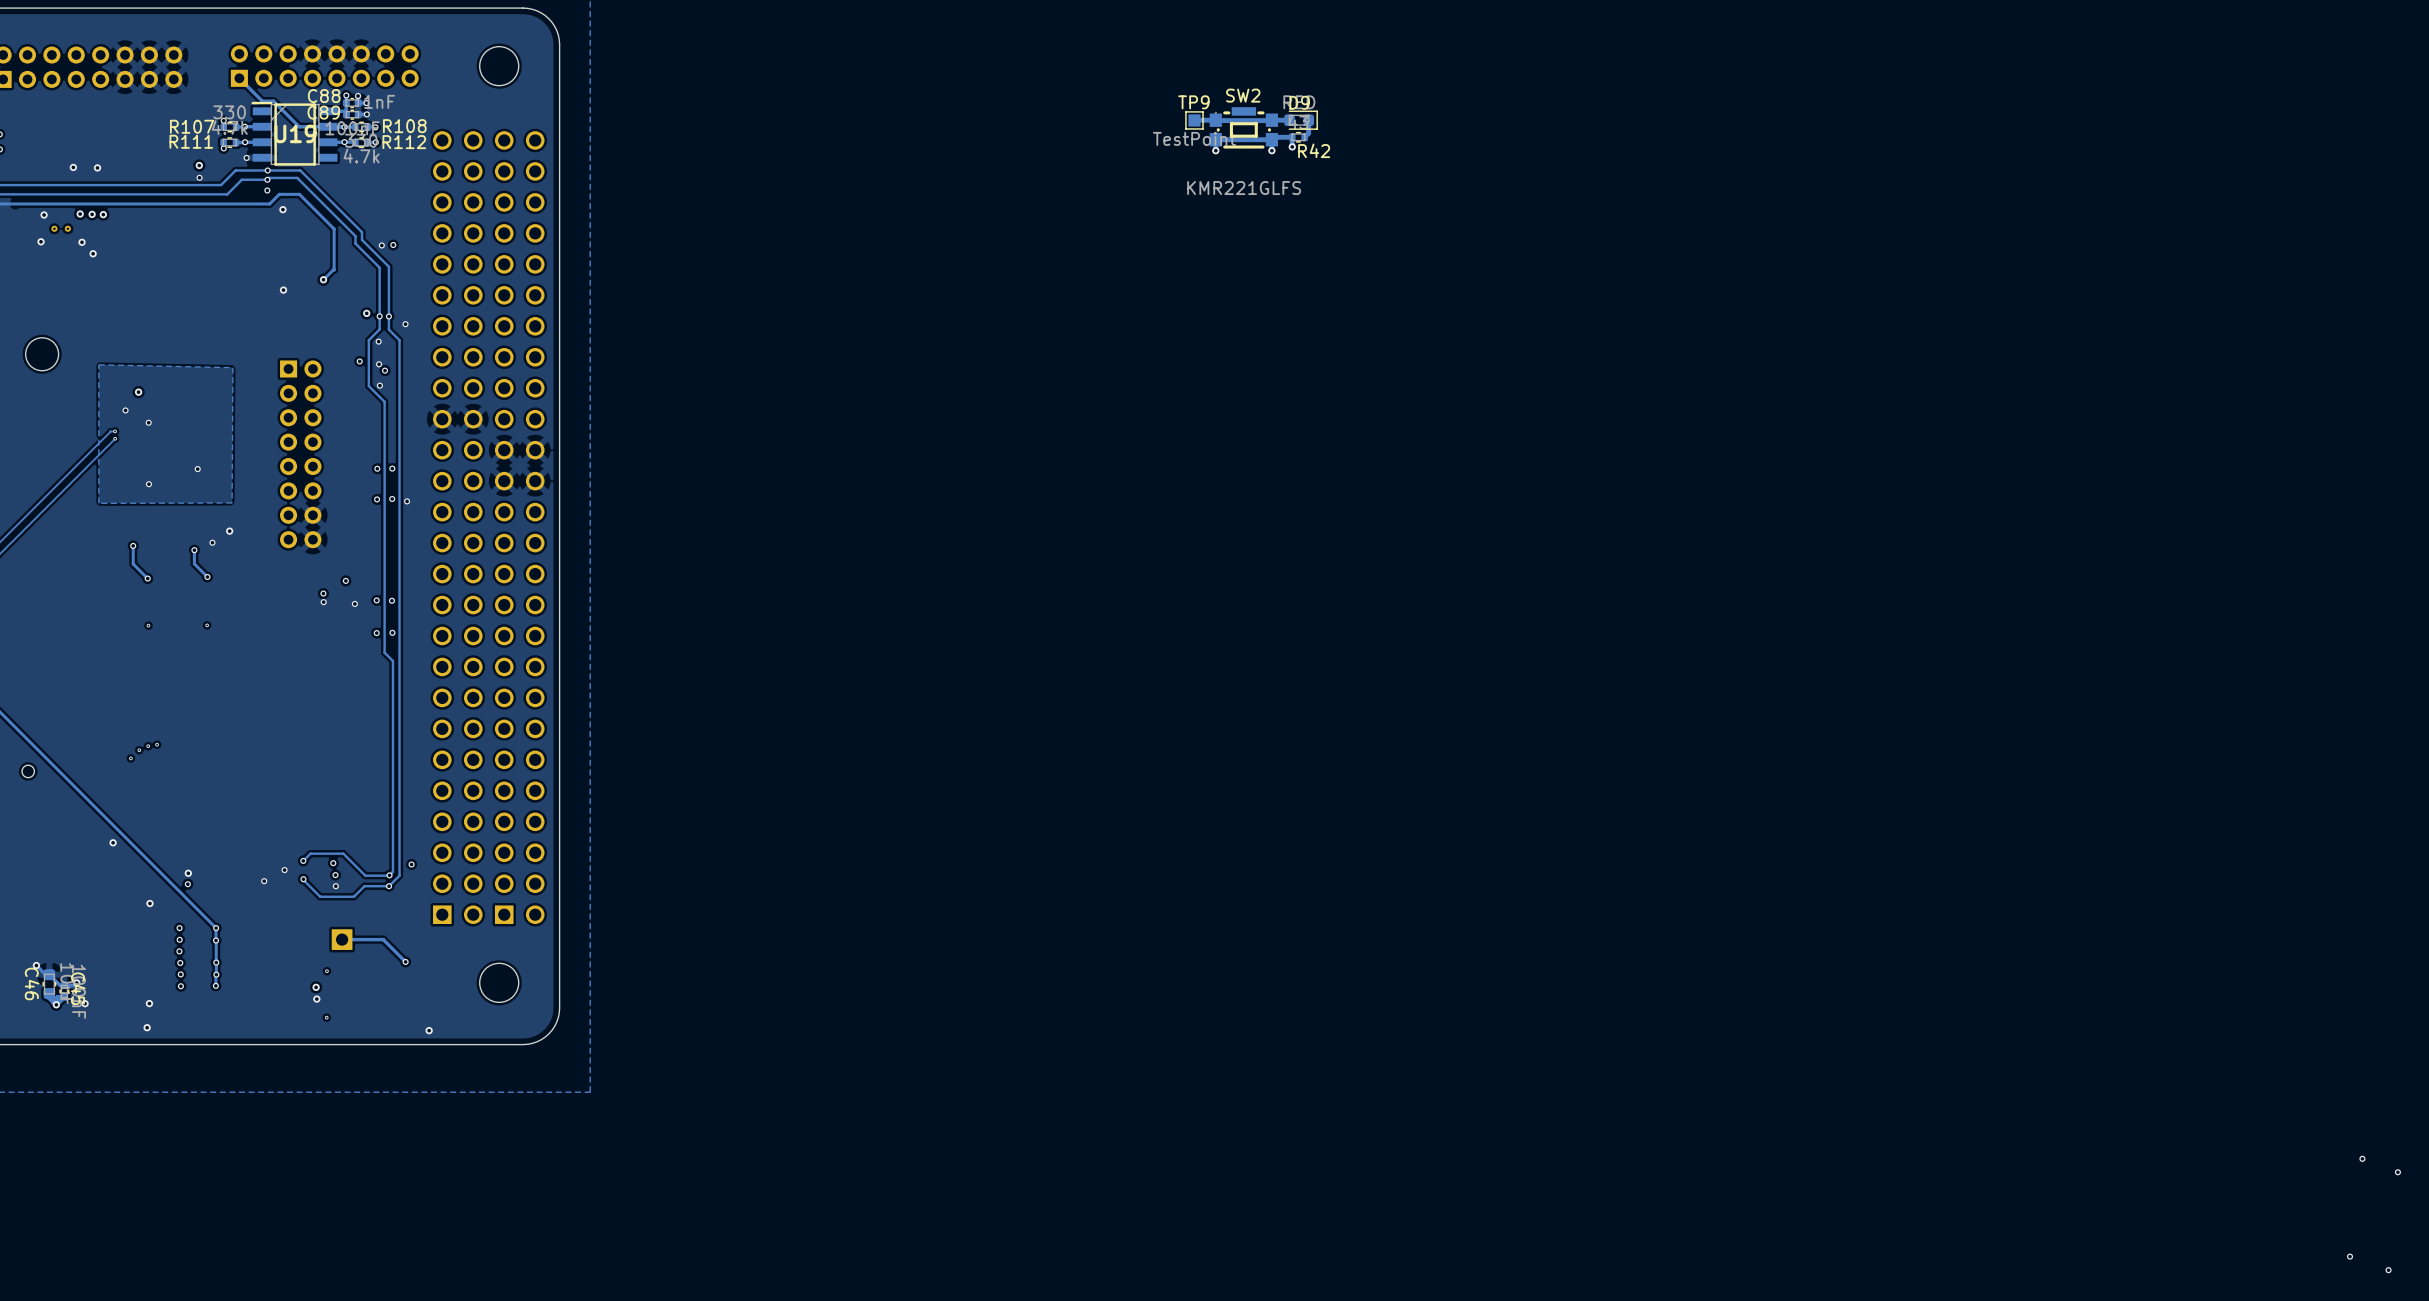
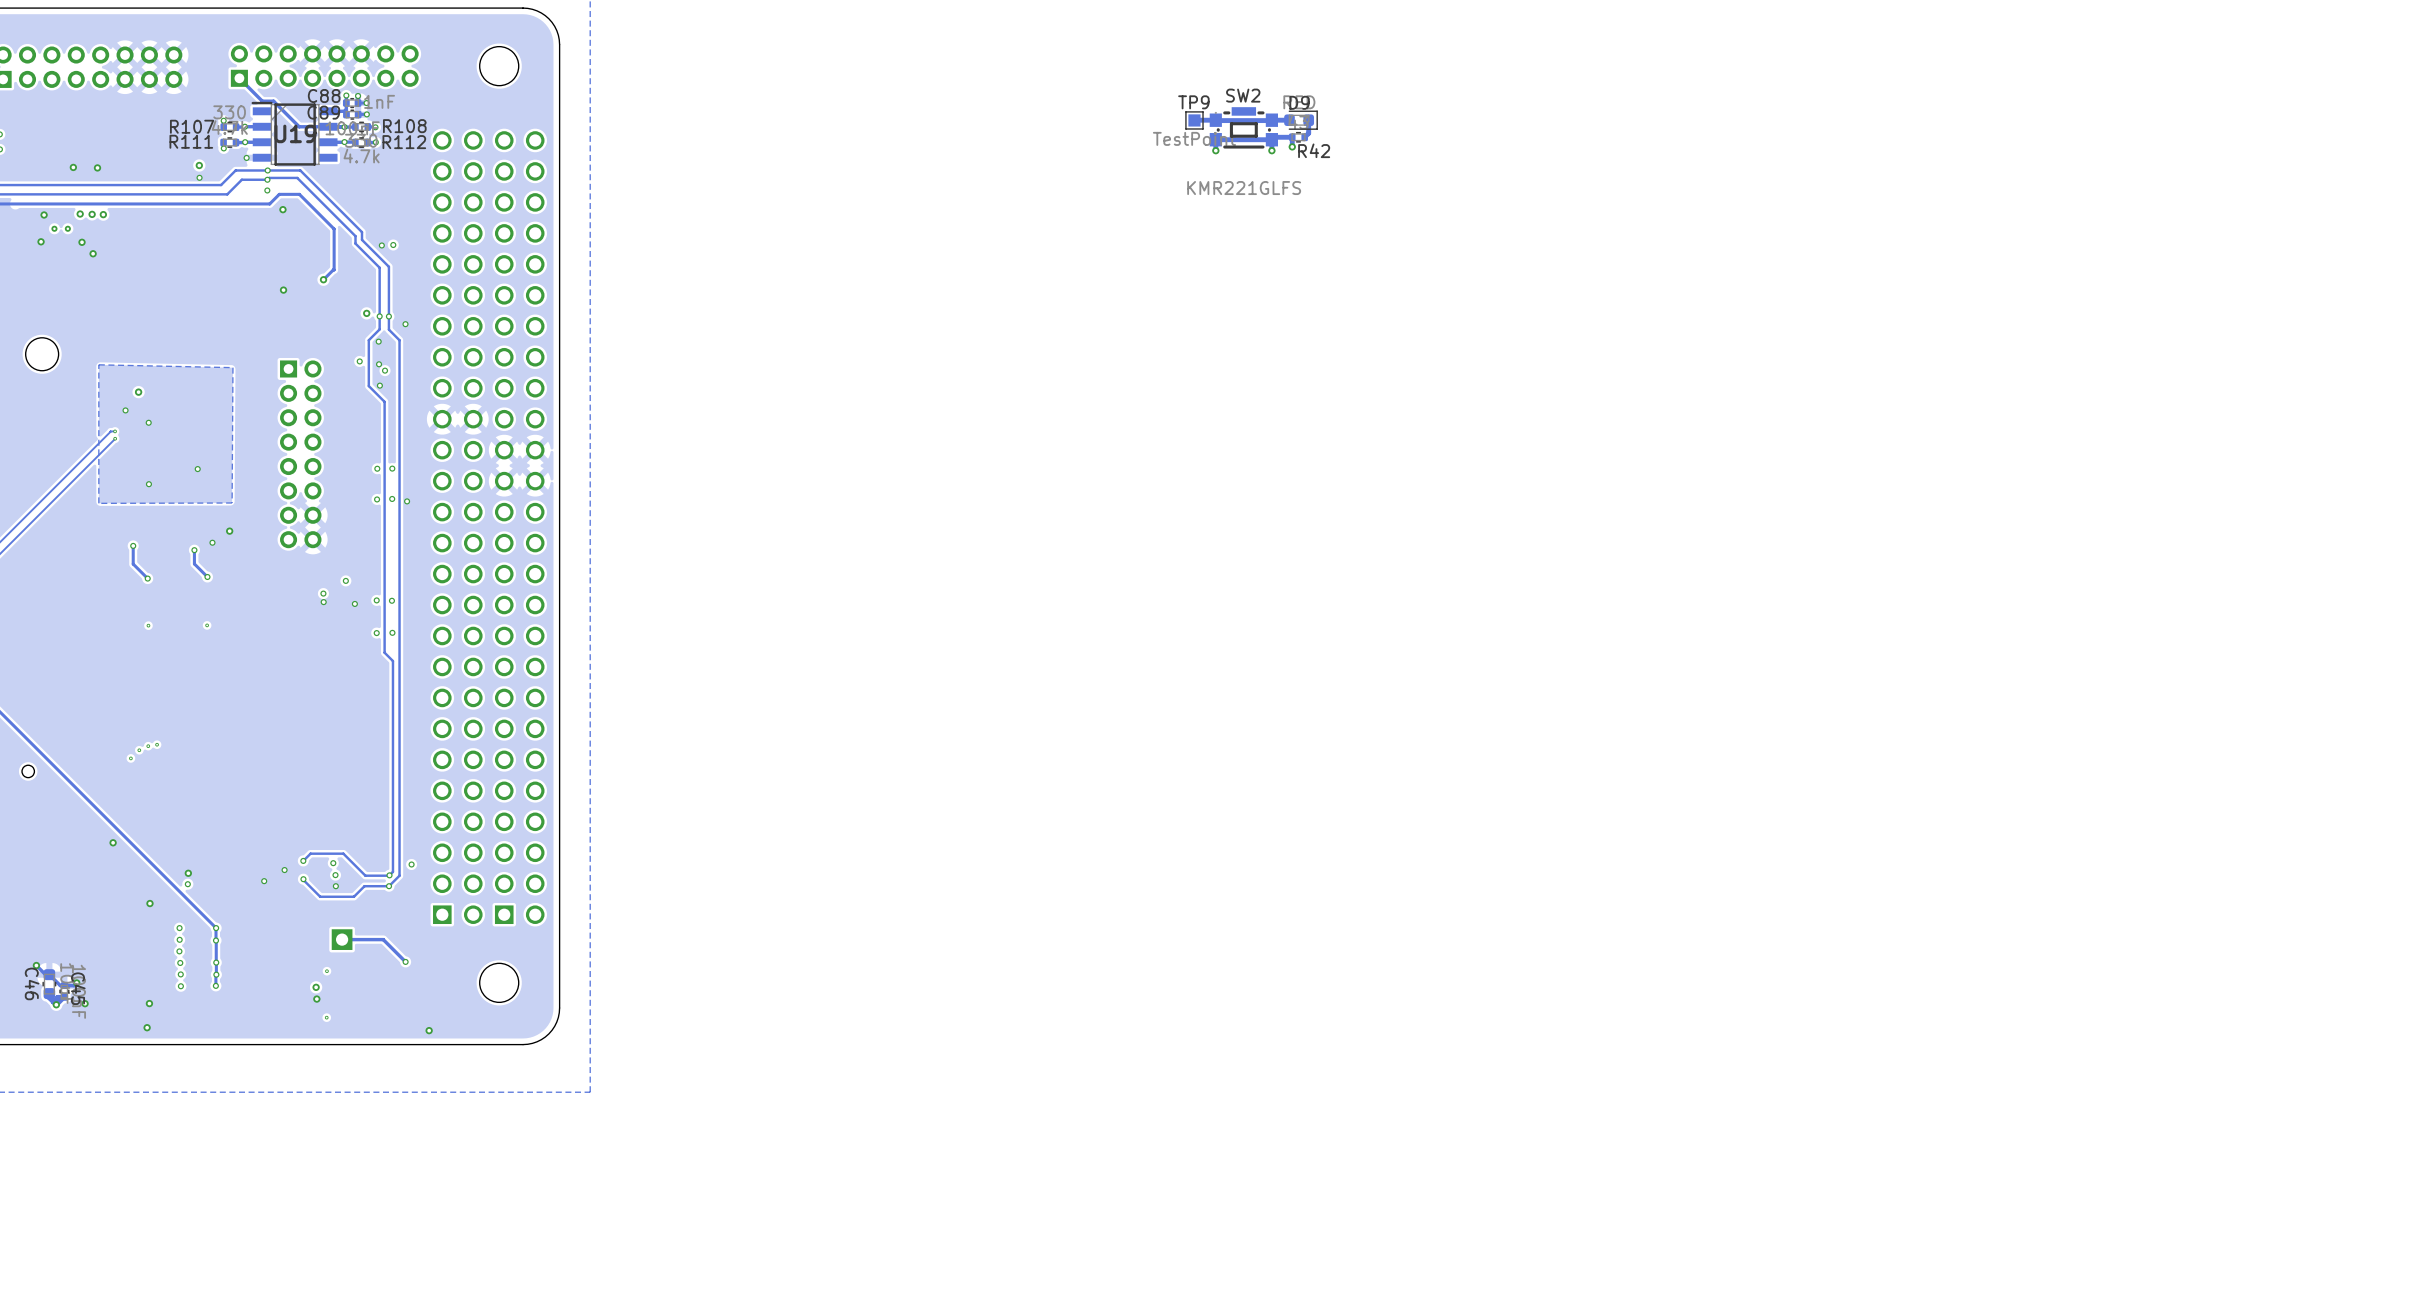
via: (2362, 1158) -> none
via: (2397, 1172) -> none
via: (2350, 1256) -> none
via: (2388, 1270) -> none

